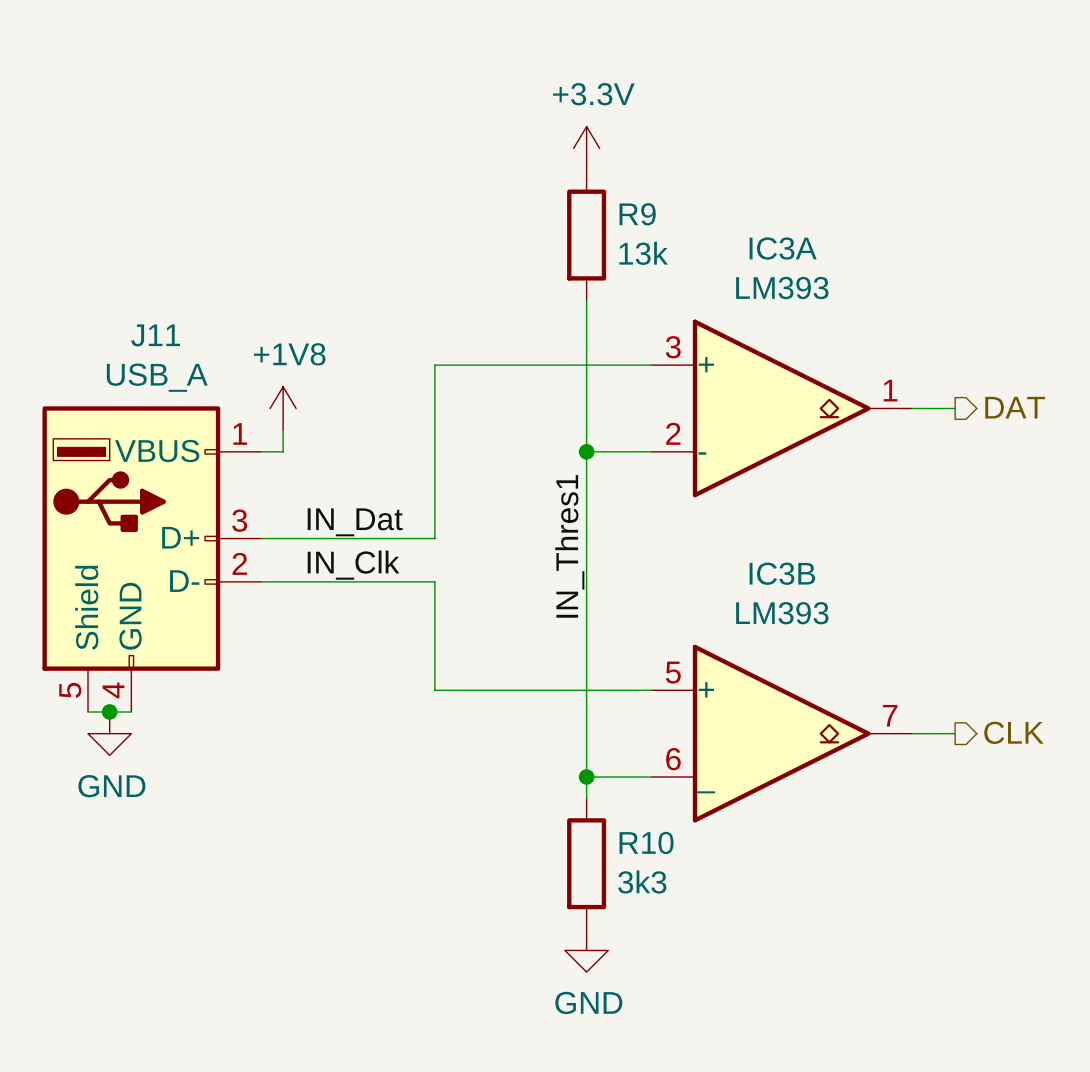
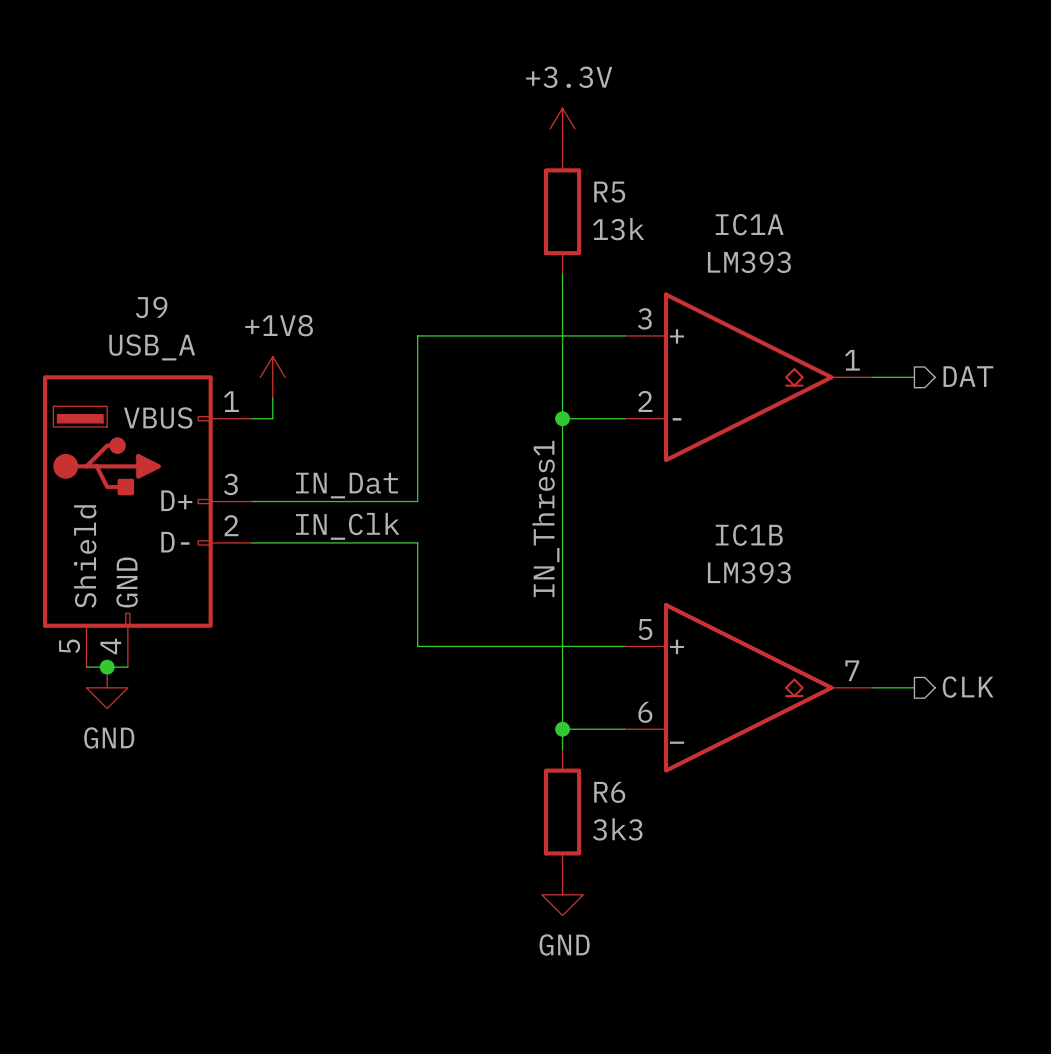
R9 name: R9 (637, 214) -> R5 (609, 192)
IC3A name: IC3A (783, 248) -> IC1A (749, 224)
J11 name: J11 (155, 335) -> J9 (151, 307)
IC3B name: IC3B (782, 573) -> IC1B (749, 535)
R10 name: R10 (646, 842) -> R6 (609, 792)

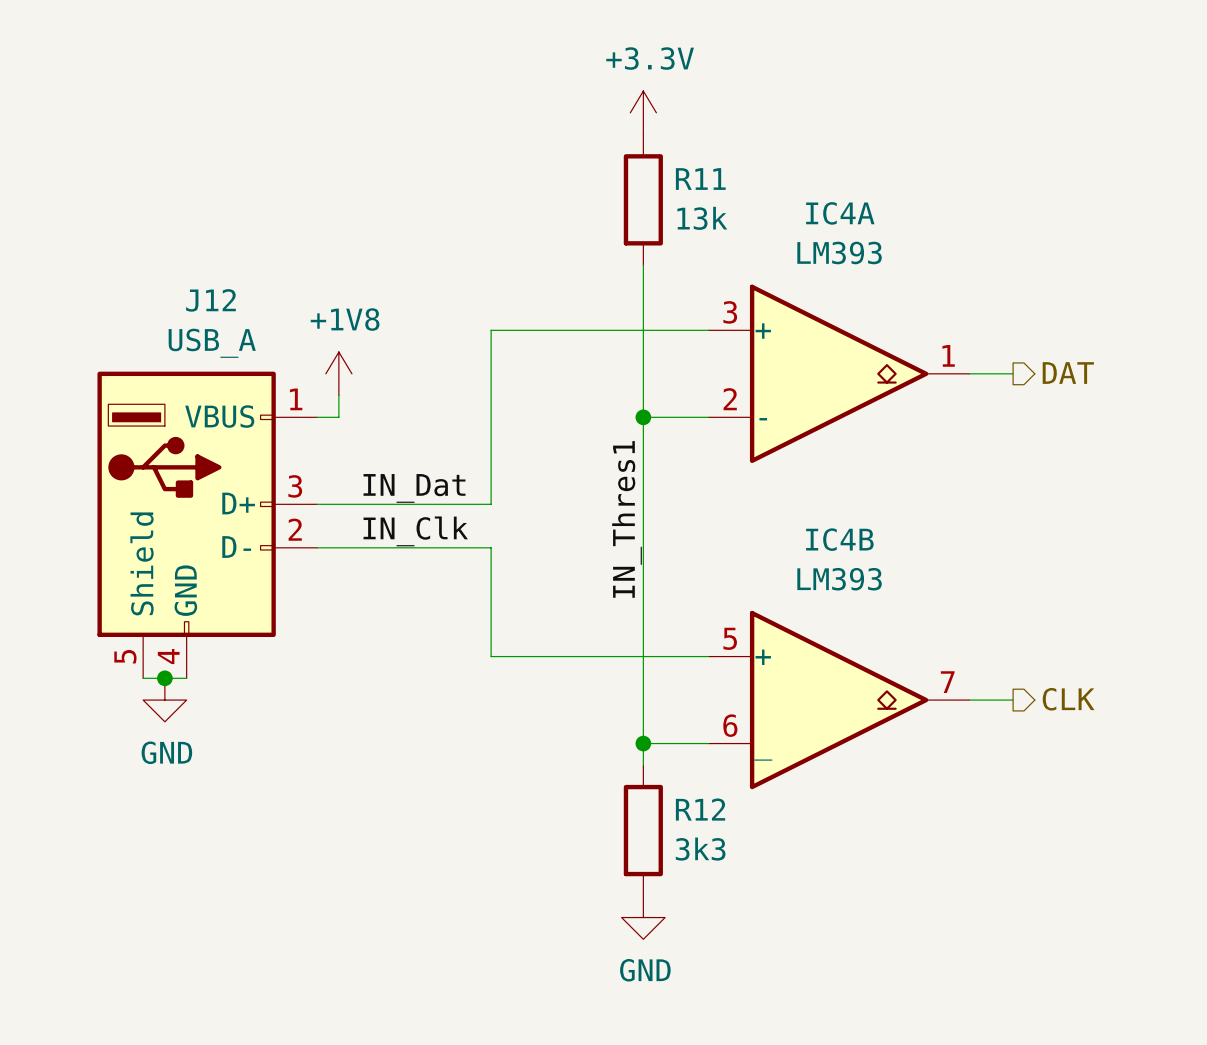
R5 name: R5 (609, 192) -> R11 (700, 179)
IC1A name: IC1A (749, 224) -> IC4A (840, 213)
J9 name: J9 (151, 307) -> J12 (210, 300)
IC1B name: IC1B (749, 535) -> IC4B (839, 539)
R6 name: R6 (609, 792) -> R12 (700, 809)

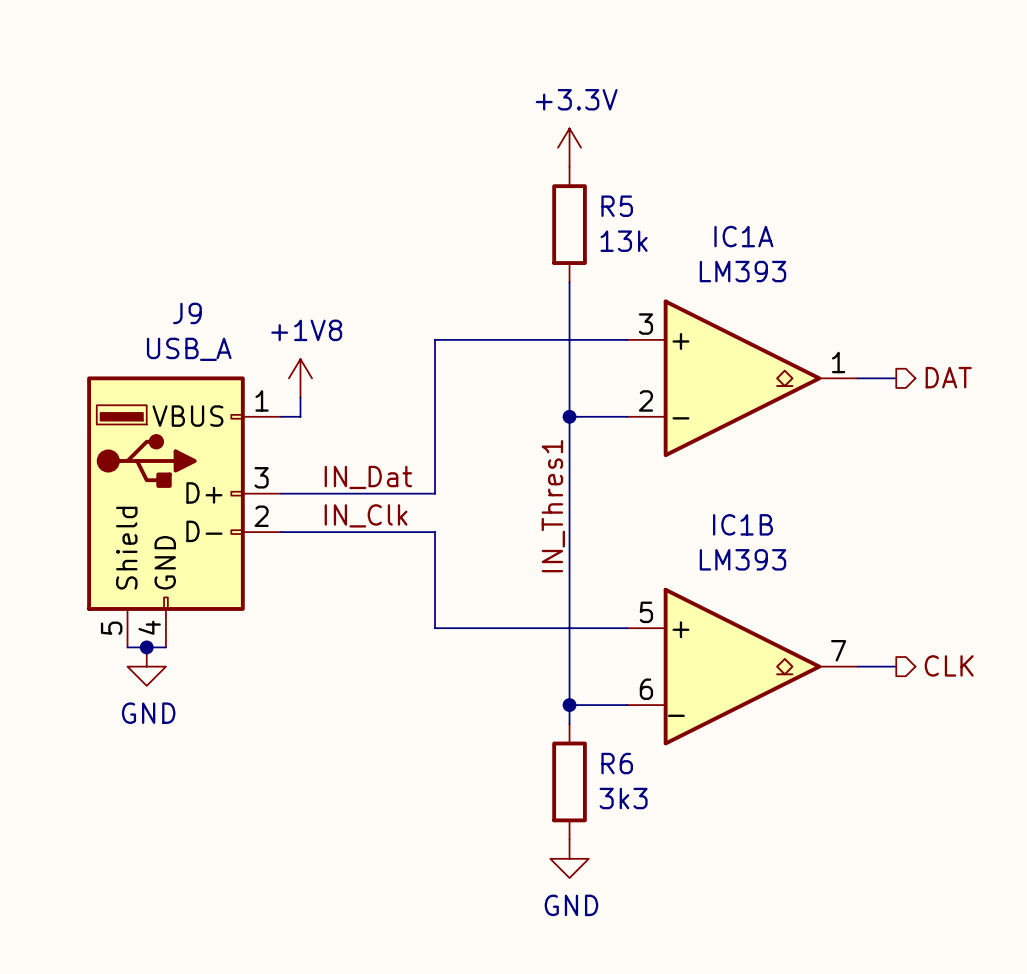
R11 name: R11 (700, 179) -> R5 (617, 206)
IC4A name: IC4A (840, 213) -> IC1A (743, 236)
J12 name: J12 (210, 300) -> J9 (187, 313)
IC4B name: IC4B (839, 539) -> IC1B (742, 524)
R12 name: R12 (700, 809) -> R6 (617, 763)

